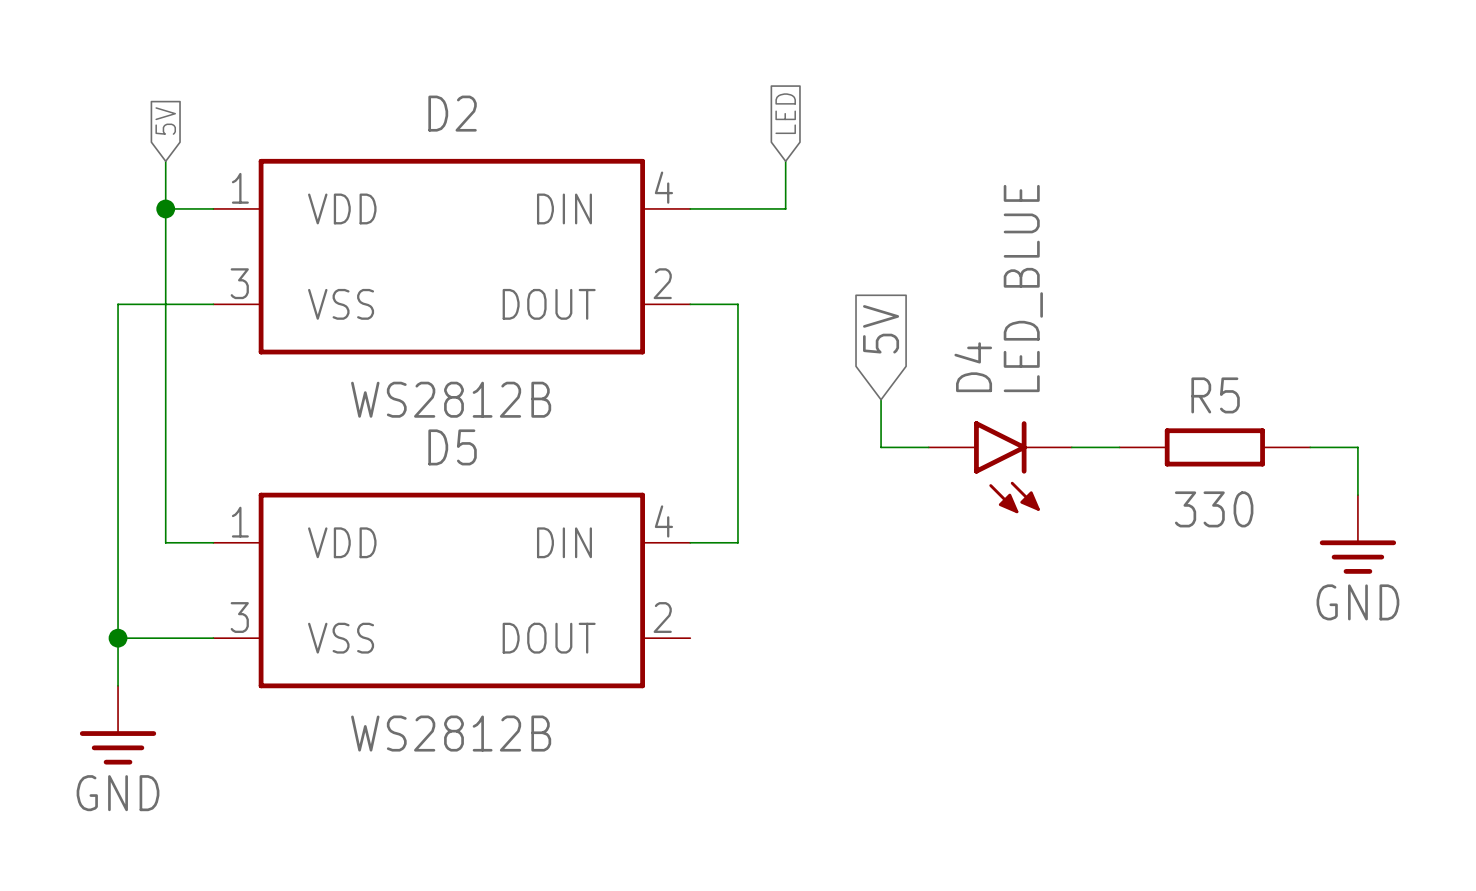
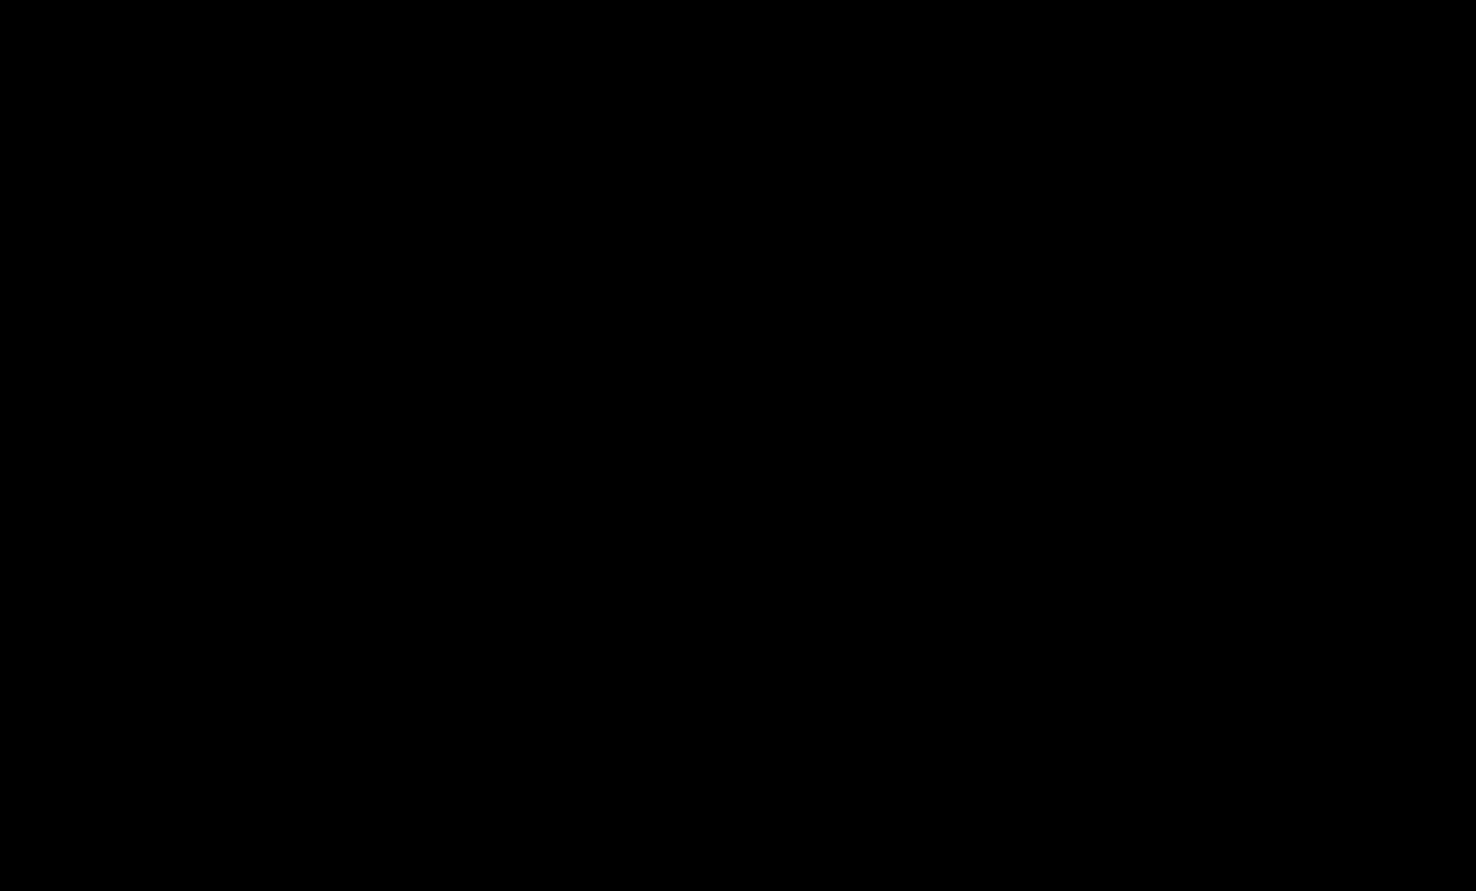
global label: LED (785, 113) -> none
global label: 5V (165, 121) -> none
wire: (165, 161) (165, 542) (213, 542) -> none
wire: (785, 161) (785, 208) (690, 208) -> none
wire: (165, 208) (213, 208) -> none
junction: (165, 208) -> none
D2: WS2812B (451, 256) -> none
wire: (213, 304) (118, 304) (118, 685) -> none
wire: (690, 304) (737, 304) (737, 542) (690, 542) -> none
global label: 5V (881, 329) -> none
wire: (881, 399) (881, 447) (928, 447) -> none
wire: (1071, 447) (1119, 447) -> none
R5: 330 (1214, 447) -> none
wire: (1310, 447) (1357, 447) (1357, 495) -> none
D4: LED_BLUE (1000, 467) -> none
power symbol: GND (1357, 534) -> none
D5: WS2812B (451, 590) -> none
wire: (118, 638) (213, 638) -> none
junction: (118, 638) -> none
power symbol: GND (118, 725) -> none

